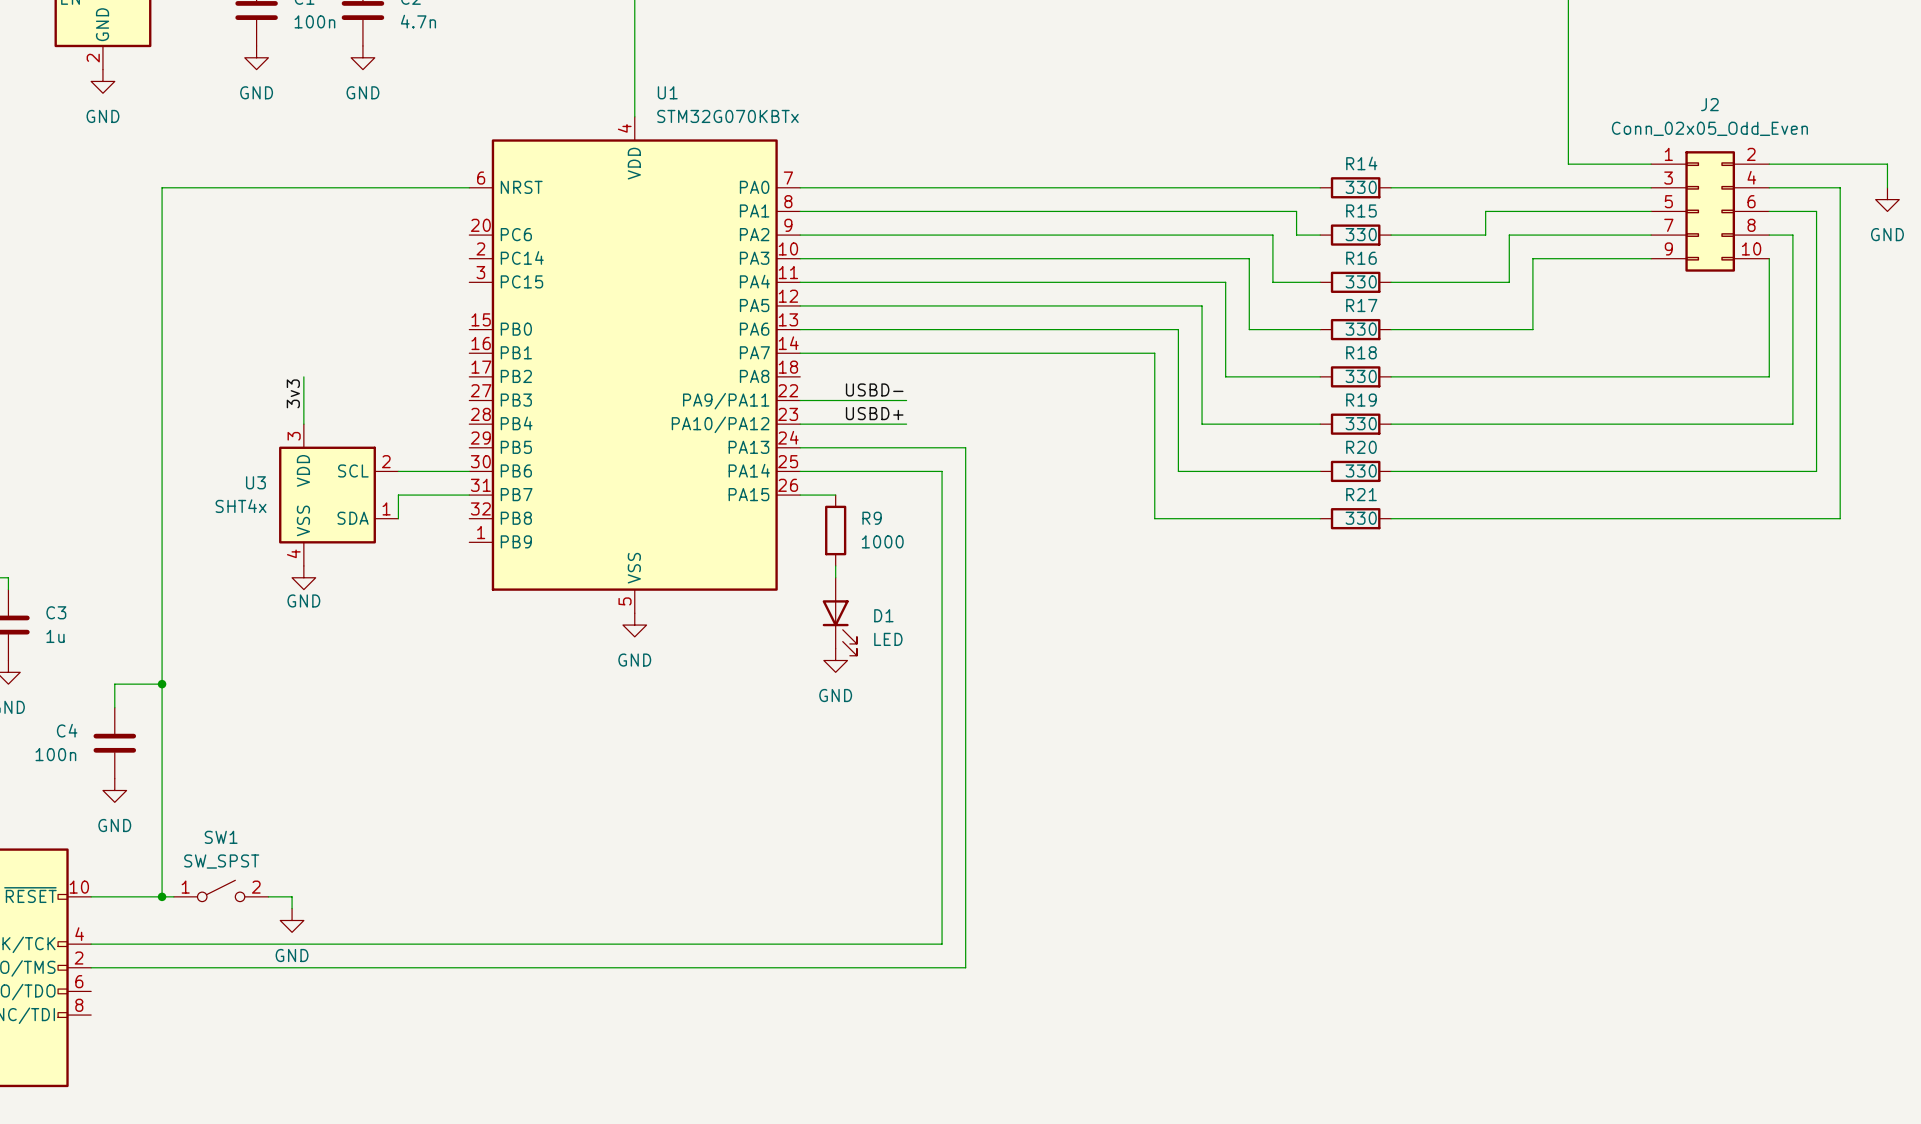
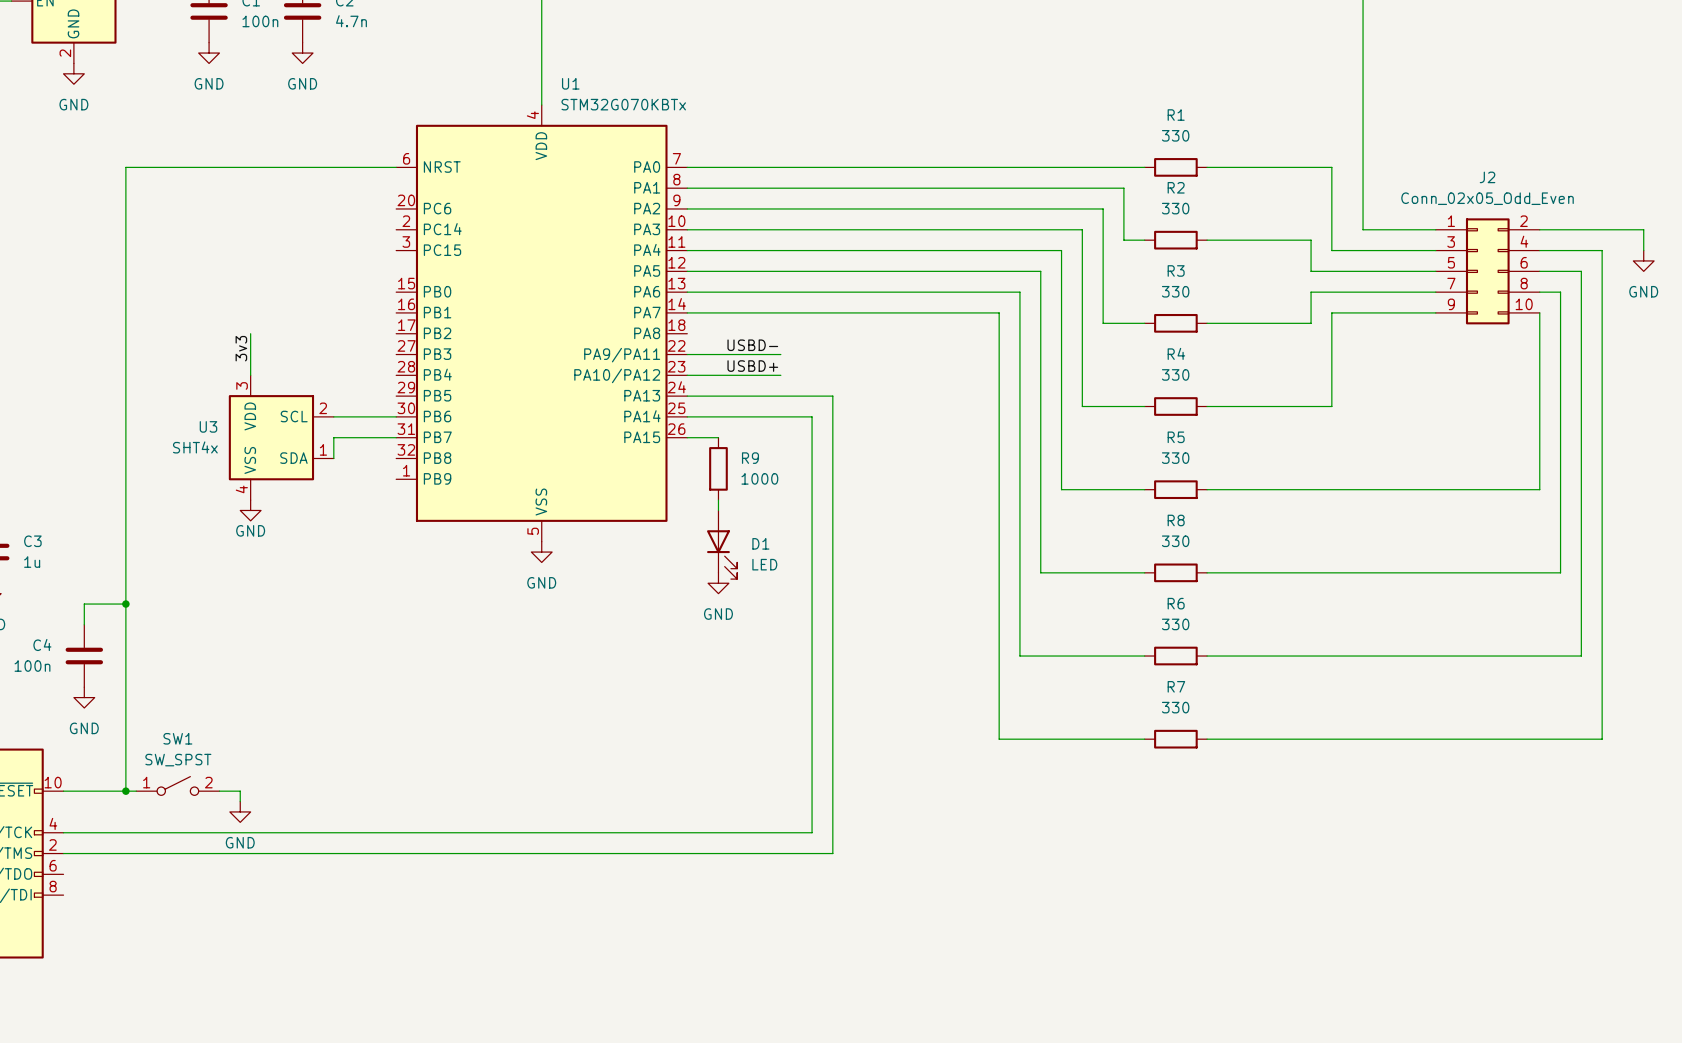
R14 name: R14 (1361, 163) -> R1 (1176, 115)
wire: (1568, 164) (1651, 164) -> (1363, 146) (1363, 229)
wire: (1769, 164) (1887, 164) (1887, 187) -> none
R14 value position: 330 (1361, 187) -> 330 (1175, 135)
wire: (1532, 187) (1651, 187) -> (1331, 292) (1435, 292)
wire: (1769, 187) (1840, 187) (1840, 282) -> (1539, 250) (1602, 250)
power symbol position: GND (1887, 199) -> GND (1643, 260)
wire: (1651, 211) (1485, 211) (1485, 235) (1391, 235) -> none
J2 position: (1710, 211) -> (1487, 271)
wire: (1769, 211) (1816, 211) (1816, 305) -> (1539, 271) (1581, 271)
wire: (1296, 235) (1320, 235) -> (1123, 208) (1123, 240) (1144, 240)
R15: 330 (1355, 235) -> none
wire: (1651, 235) (1509, 235) (1509, 270) -> (1207, 240) (1311, 240)
wire: (1769, 235) (1792, 235) (1792, 329) -> (1539, 292) (1560, 292)
wire: (1532, 258) (1568, 258) -> (1331, 229) (1331, 167)
wire: (1769, 258) (1769, 353) -> (1539, 229) (1643, 229) (1643, 250)
R2: none -> 330 (1175, 240)
wire: (1272, 282) (1320, 282) -> (1103, 250) (1103, 323) (1144, 323)
R16: 330 (1355, 282) -> none
wire: (1391, 282) (1509, 282) -> (1435, 271) (1311, 271) (1311, 250)
wire: (1532, 282) (1532, 329) -> (1331, 250) (1435, 250)
wire: (1249, 329) (1320, 329) -> (1082, 292) (1082, 406) (1144, 406)
R17: 330 (1355, 329) -> none
wire: (1391, 329) (1509, 329) -> (1207, 323) (1311, 323) (1311, 292)
wire: none -> (1435, 312) (1331, 312) (1331, 406) (1207, 406)
R3: none -> 330 (1175, 323)
wire: (1225, 376) (1320, 376) -> (1061, 333) (1061, 489) (1144, 489)
R18: 330 (1355, 376) -> none
wire: (1391, 376) (1769, 376) -> (1207, 489) (1539, 489) (1539, 333)
wire: (1202, 424) (1320, 424) -> (1040, 375) (1040, 572) (1144, 572)
R19: 330 (1355, 424) -> none
wire: (1391, 424) (1792, 424) -> (1207, 572) (1560, 572) (1560, 375)
R4: none -> 330 (1175, 406)
wire: (1178, 471) (1320, 471) -> (1019, 416) (1019, 656) (1144, 656)
R20: 330 (1355, 471) -> none
wire: (1391, 471) (1816, 471) -> (1207, 656) (1581, 656) (1581, 416)
wire: (1154, 518) (1320, 518) -> (999, 458) (999, 739) (1144, 739)
R21: 330 (1355, 518) -> none
wire: (1391, 518) (1840, 518) -> (1207, 739) (1602, 739) (1602, 458)
R5: none -> 330 (1175, 489)
R8: none -> 330 (1175, 572)
R6: none -> 330 (1175, 656)
R7: none -> 330 (1175, 739)

